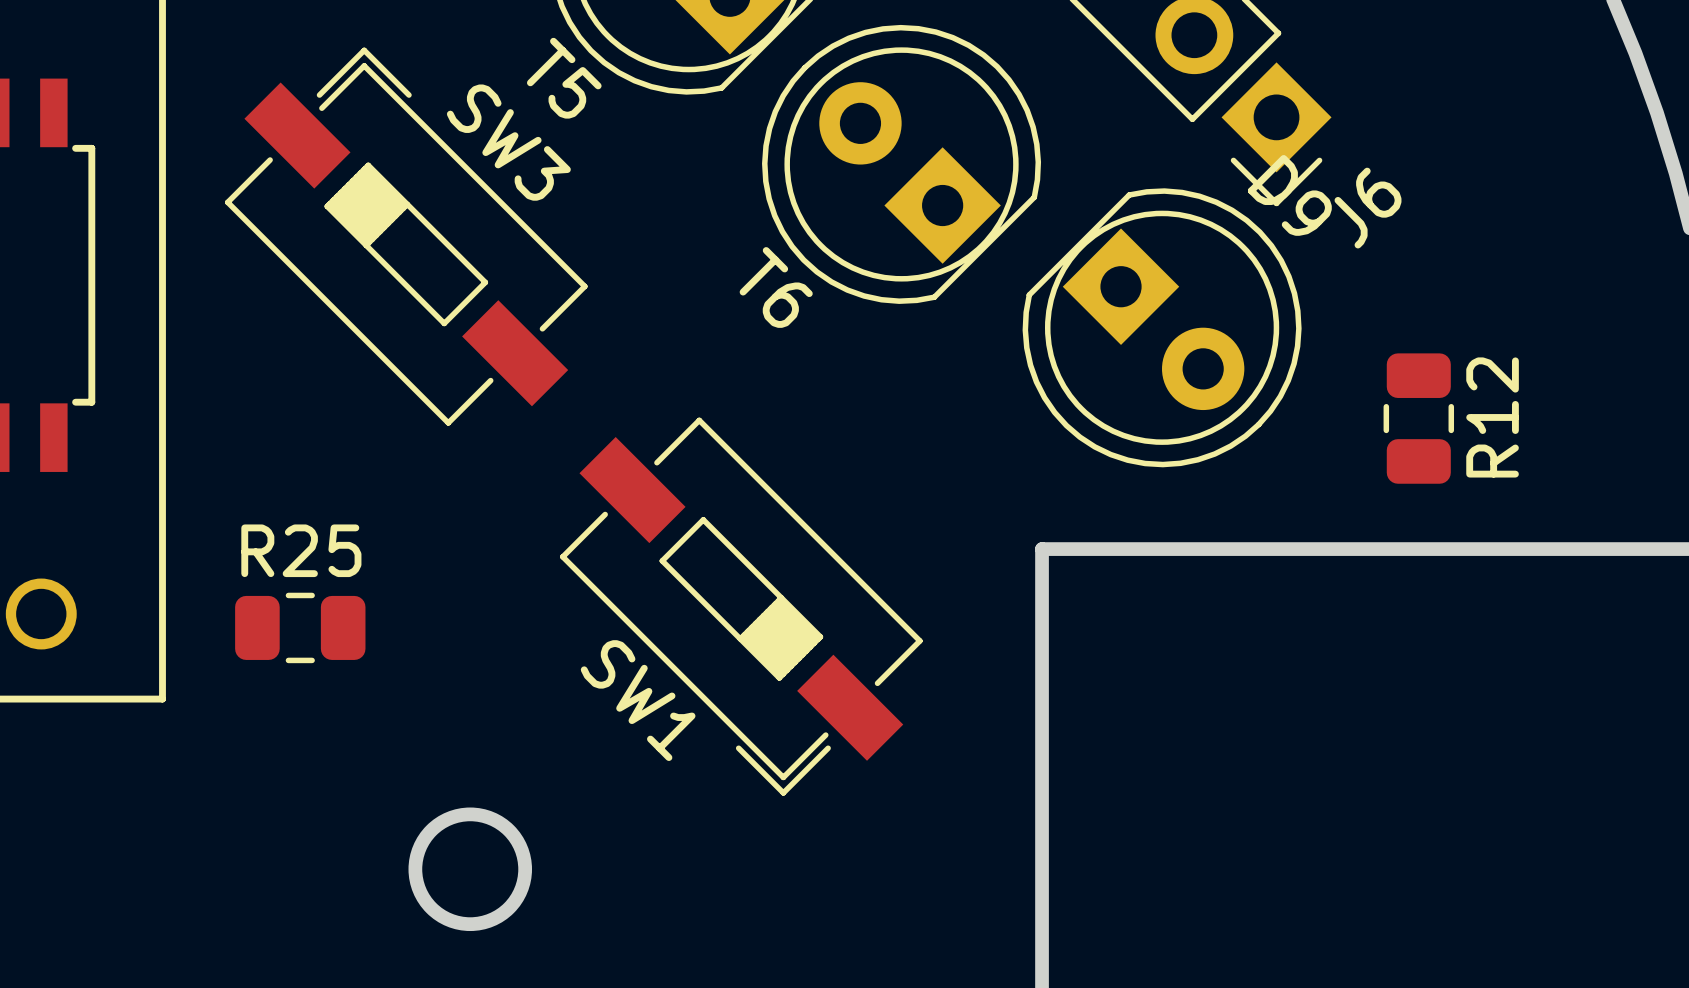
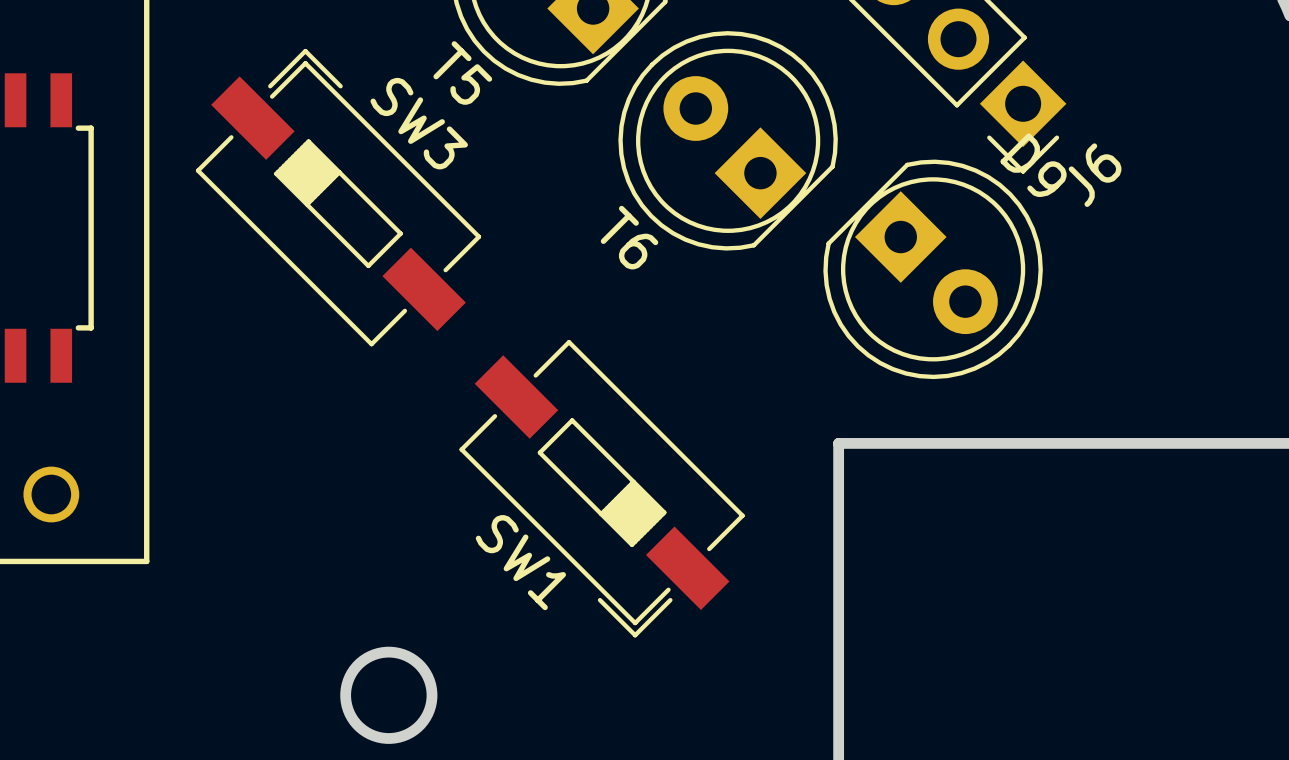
R12: (1418, 418) -> none
R25: (300, 627) -> none

